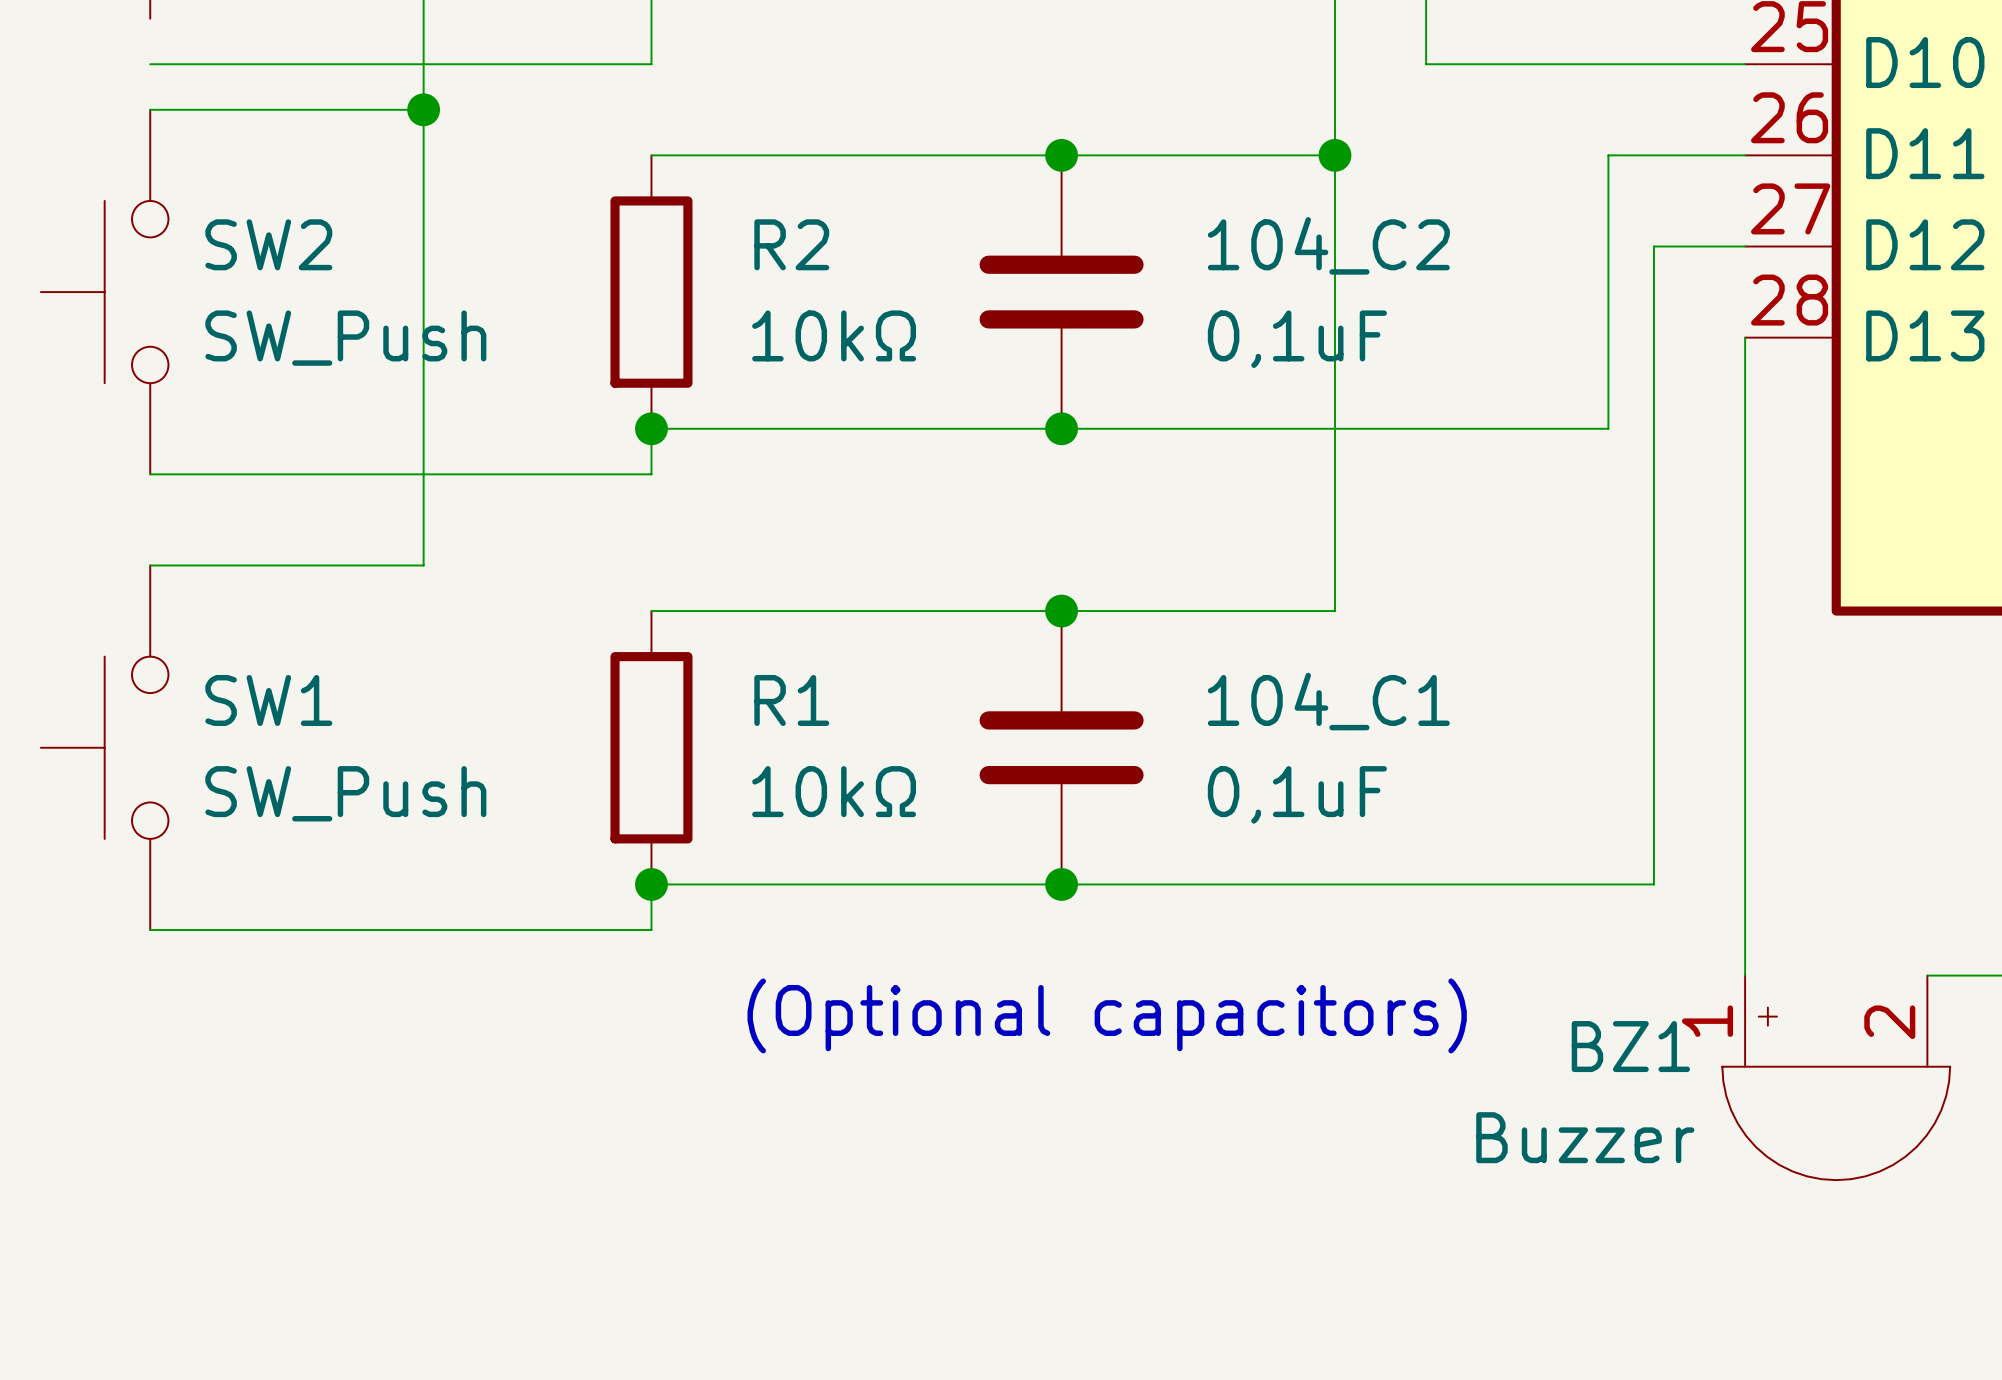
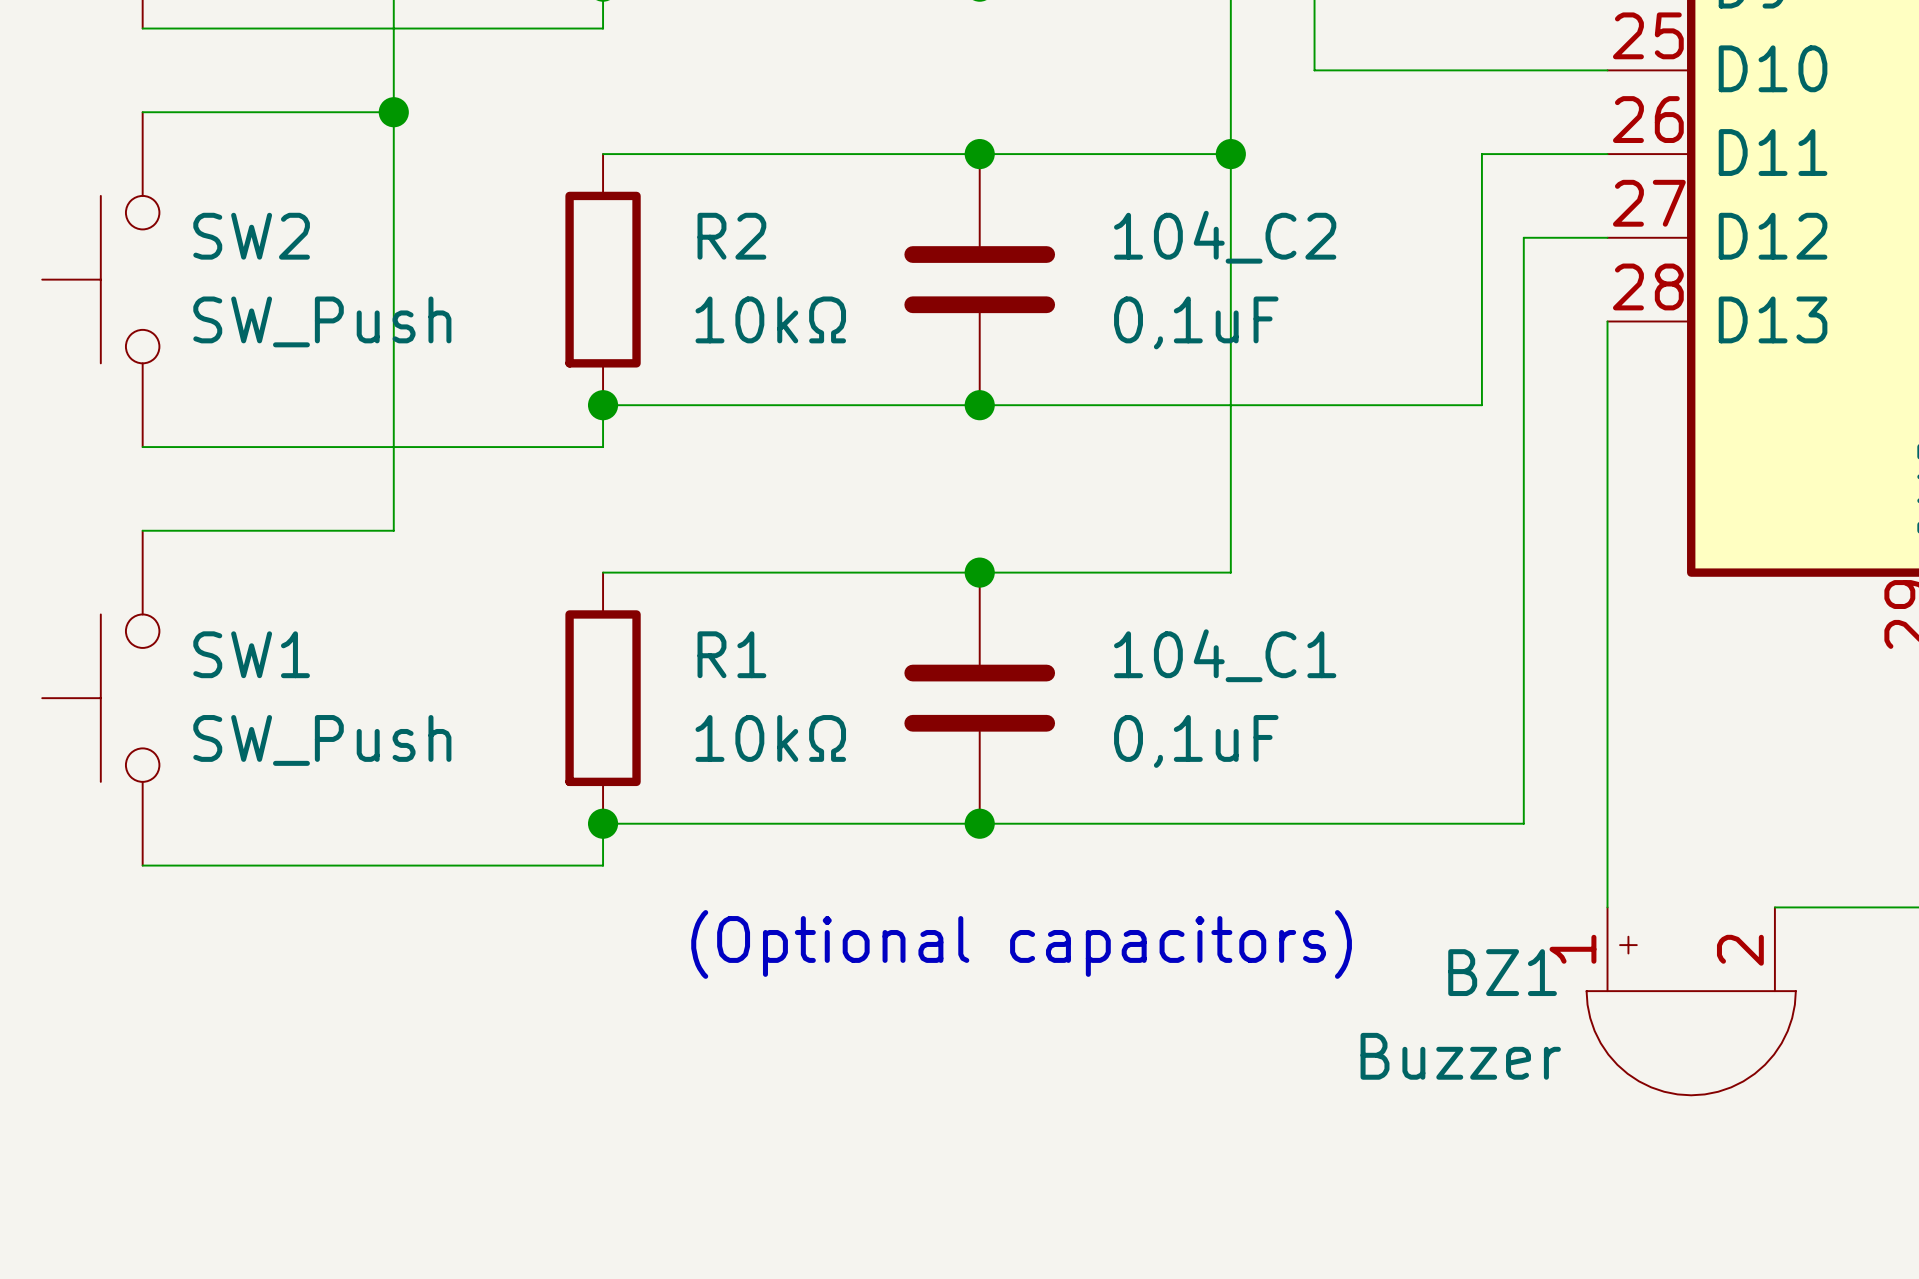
wire: (651, 18) (651, 64) (150, 64) -> (603, 28) (142, 28)

